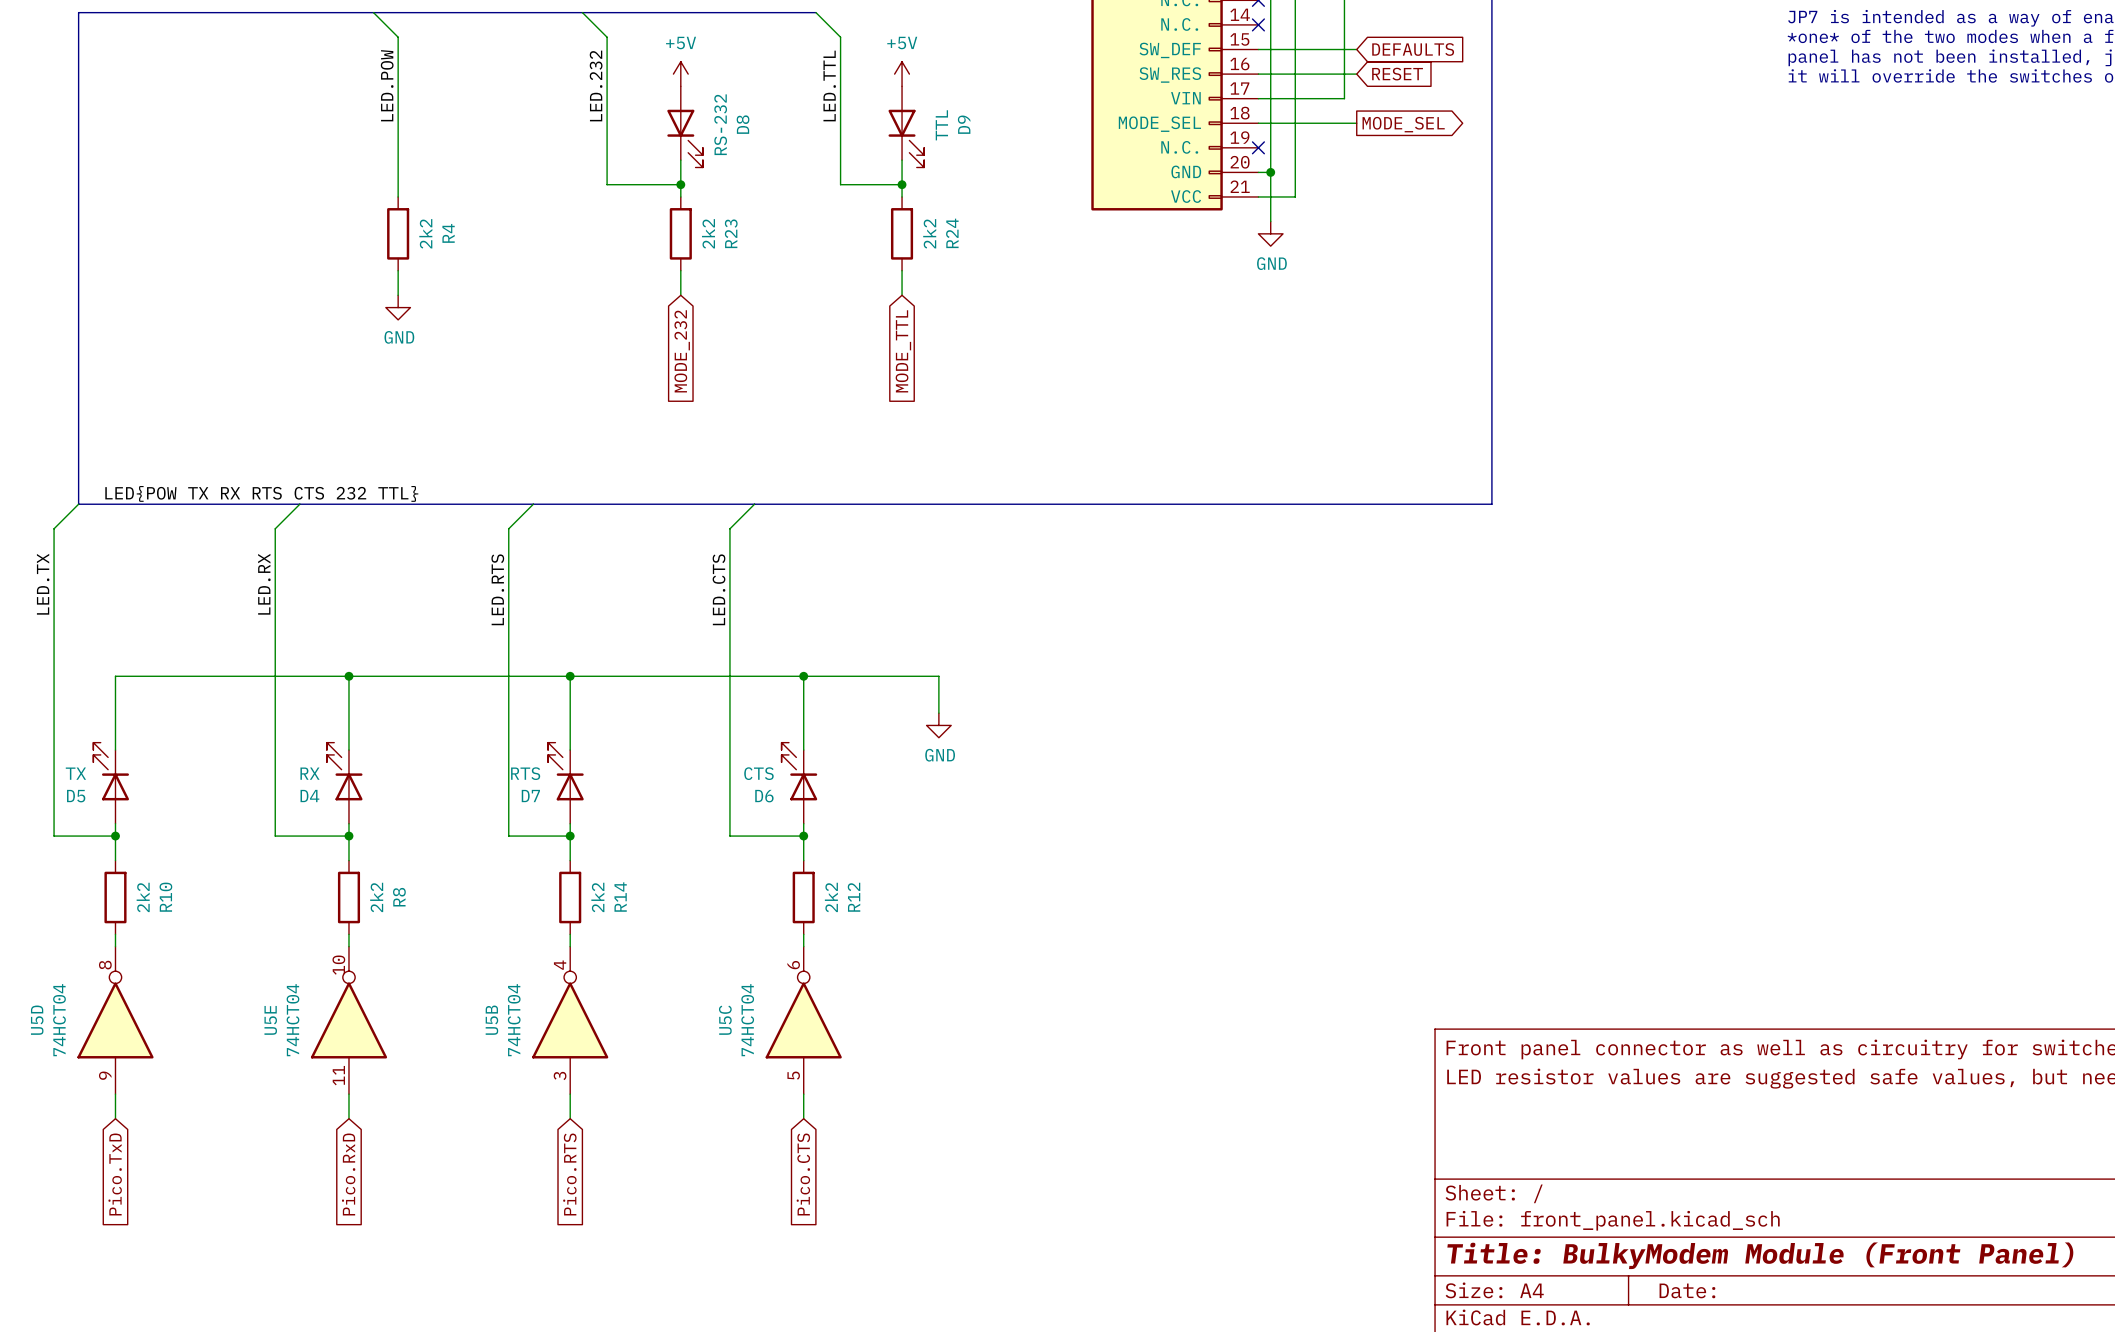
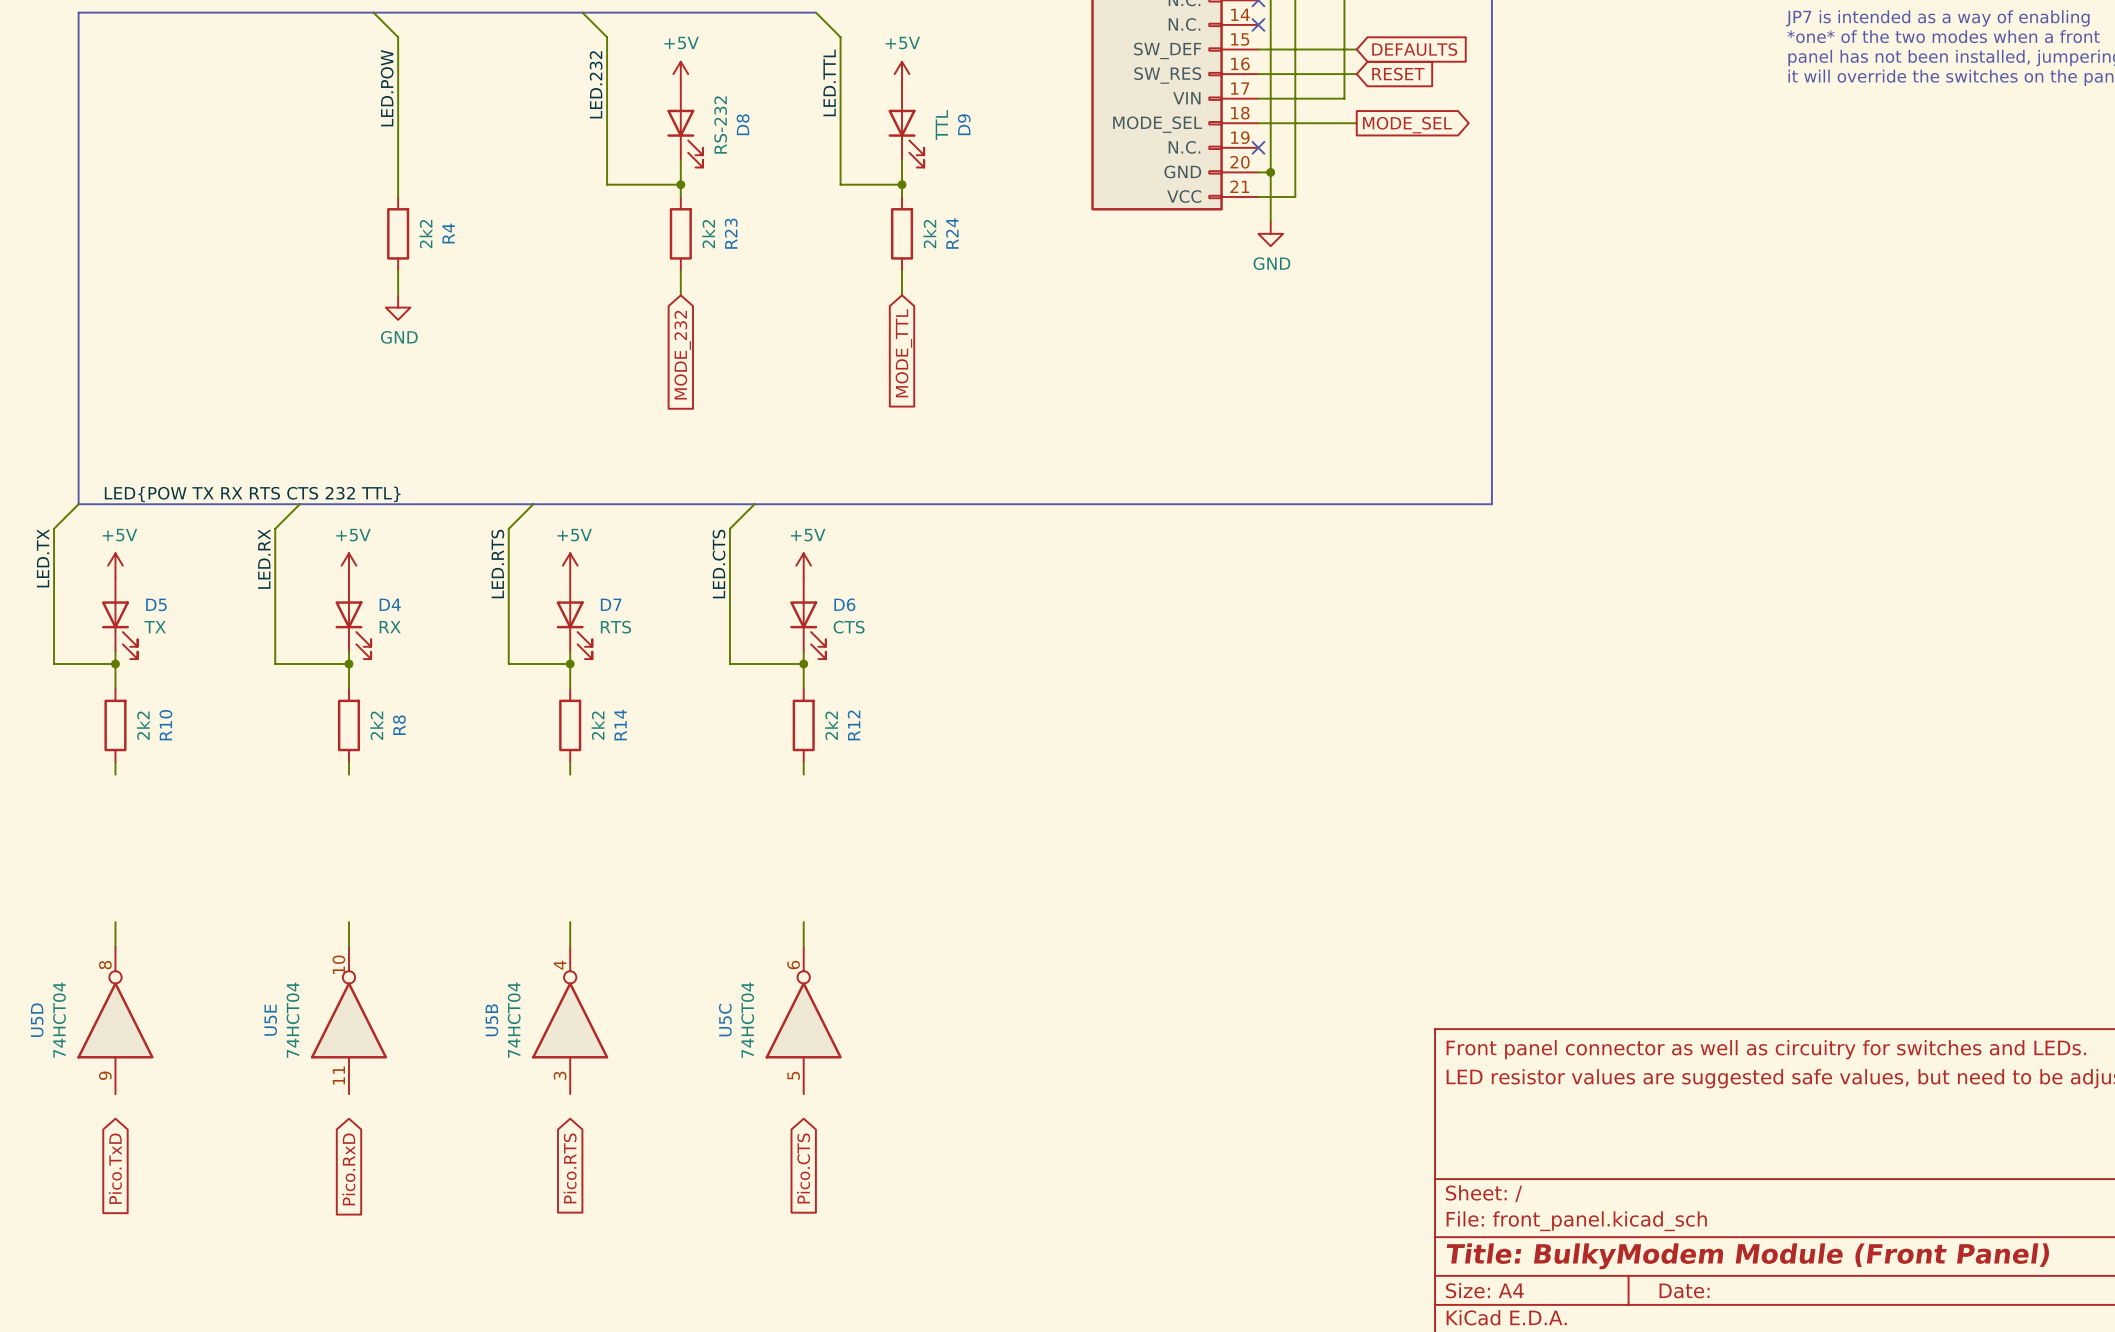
power symbol: none -> +5V (115, 565)
power symbol: none -> +5V (348, 565)
power symbol: none -> +5V (570, 565)
power symbol: none -> +5V (803, 565)
label position: LED.TX (43, 584) -> LED.TX (43, 558)
label position: LED.RX (264, 584) -> LED.RX (264, 559)
label position: LED.RTS (497, 589) -> LED.RTS (497, 563)
label position: LED.CTS (719, 589) -> LED.CTS (719, 564)
wire: none -> (348, 651) (348, 676)
wire: none -> (570, 651) (570, 676)
wire: none -> (803, 651) (803, 676)
wire: (54, 663) (54, 836) (115, 836) -> (54, 663) (115, 663)
junction: none -> (115, 663)
wire: (275, 663) (275, 836) (348, 836) -> (275, 663) (348, 663)
wire: (508, 663) (508, 836) (570, 836) -> (508, 663) (570, 663)
wire: (729, 663) (729, 836) (803, 836) -> (729, 663) (803, 663)
wire: (115, 676) (938, 676) (938, 713) -> (115, 676) (115, 651)
junction position: (348, 676) -> (348, 663)
junction position: (570, 676) -> (570, 663)
junction position: (803, 676) -> (803, 663)
wire: (115, 688) (115, 750) -> none
wire: (348, 688) (348, 750) -> none
wire: (570, 688) (570, 750) -> none
wire: (803, 688) (803, 750) -> none
power symbol: GND (938, 725) -> none
D5 rotation: 0° (111, 771) -> 180° (119, 630)
D4 rotation: 0° (344, 771) -> 180° (353, 630)
D7 rotation: 0° (565, 771) -> 180° (574, 630)
D6 rotation: 0° (799, 771) -> 180° (808, 630)
D5 position: (111, 783) -> (119, 618)
D4 position: (344, 783) -> (353, 618)
D7 position: (565, 783) -> (574, 618)
D6 position: (799, 783) -> (808, 618)
wire: (115, 823) (115, 860) -> none
wire: (348, 823) (348, 860) -> none
wire: (570, 823) (570, 860) -> none
wire: (803, 823) (803, 860) -> none
junction: (115, 836) -> none
junction: (348, 836) -> none
junction: (570, 836) -> none
junction: (803, 836) -> none
R10 position: (115, 897) -> (115, 725)
R8 position: (348, 897) -> (348, 725)
R14 position: (570, 897) -> (570, 725)
R12 position: (803, 897) -> (803, 725)
wire: (115, 1094) (115, 1118) -> none
wire: (348, 1094) (348, 1118) -> none
wire: (570, 1094) (570, 1118) -> none
wire: (803, 1094) (803, 1118) -> none

